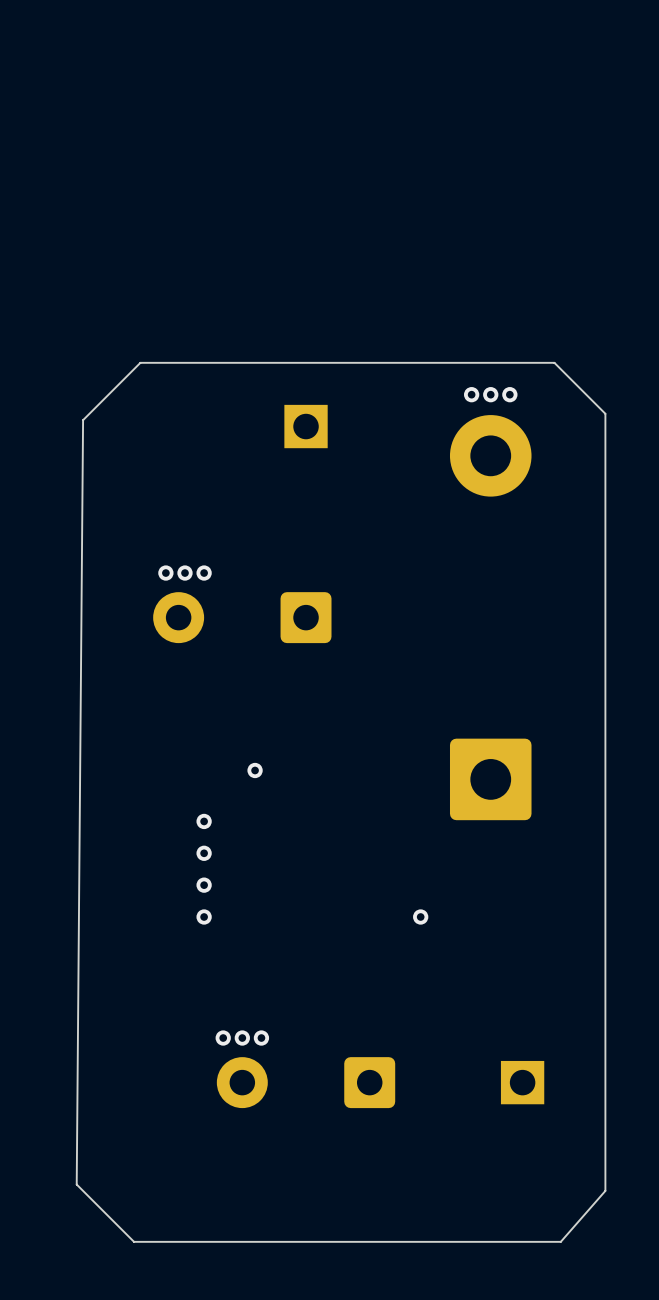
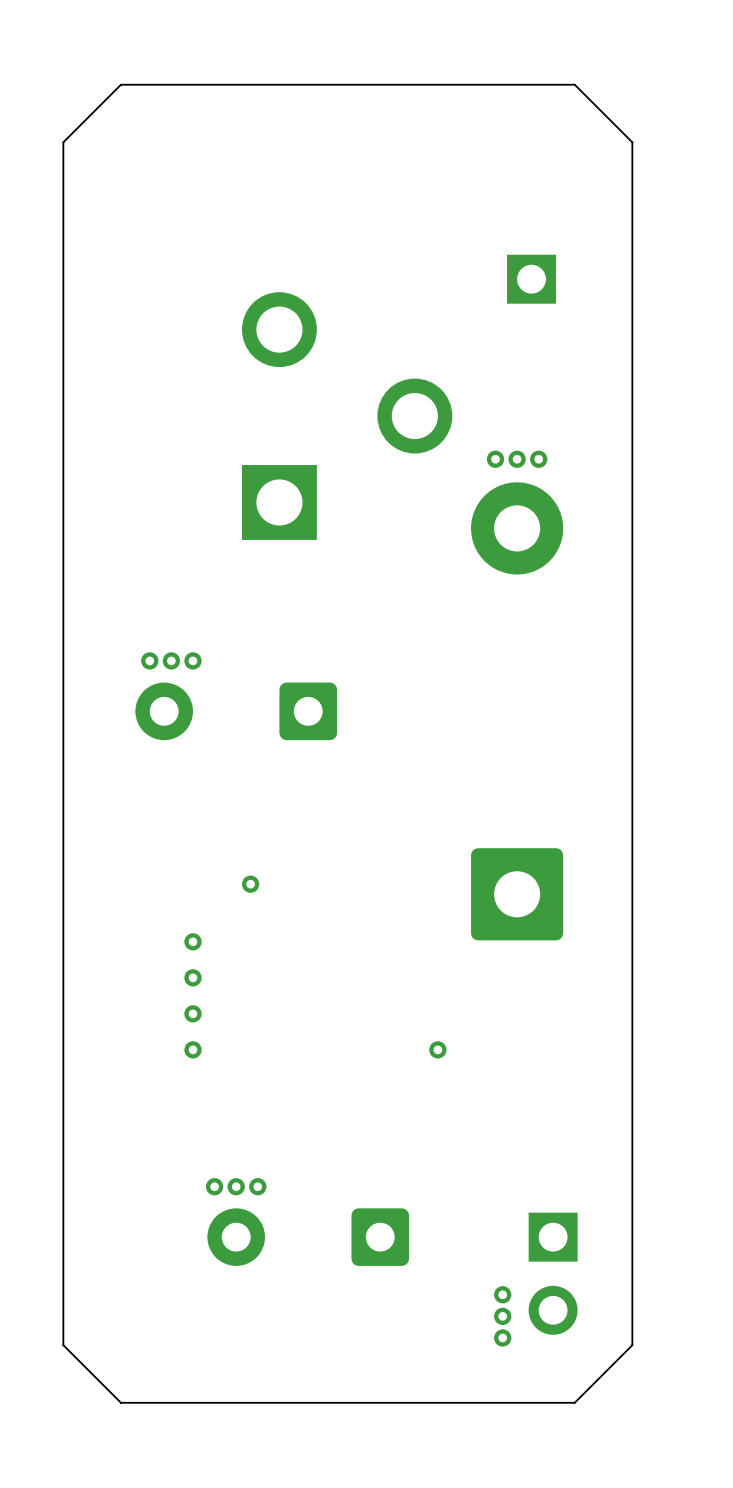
part: none -> (347, 416)
board edge: (554, 362) (605, 413) (605, 1190) (560, 1241) (134, 1241) (76, 1184) (83, 420) (140, 362) (554, 362) -> (574, 84) (632, 142) (632, 1345) (574, 1402) (120, 1402) (63, 1345) (63, 142) (120, 84) (574, 84)
part position: (306, 426) -> (531, 279)
part: none -> (553, 1273)
via: none -> (502, 1294)
via: none -> (502, 1316)
via: none -> (502, 1337)

